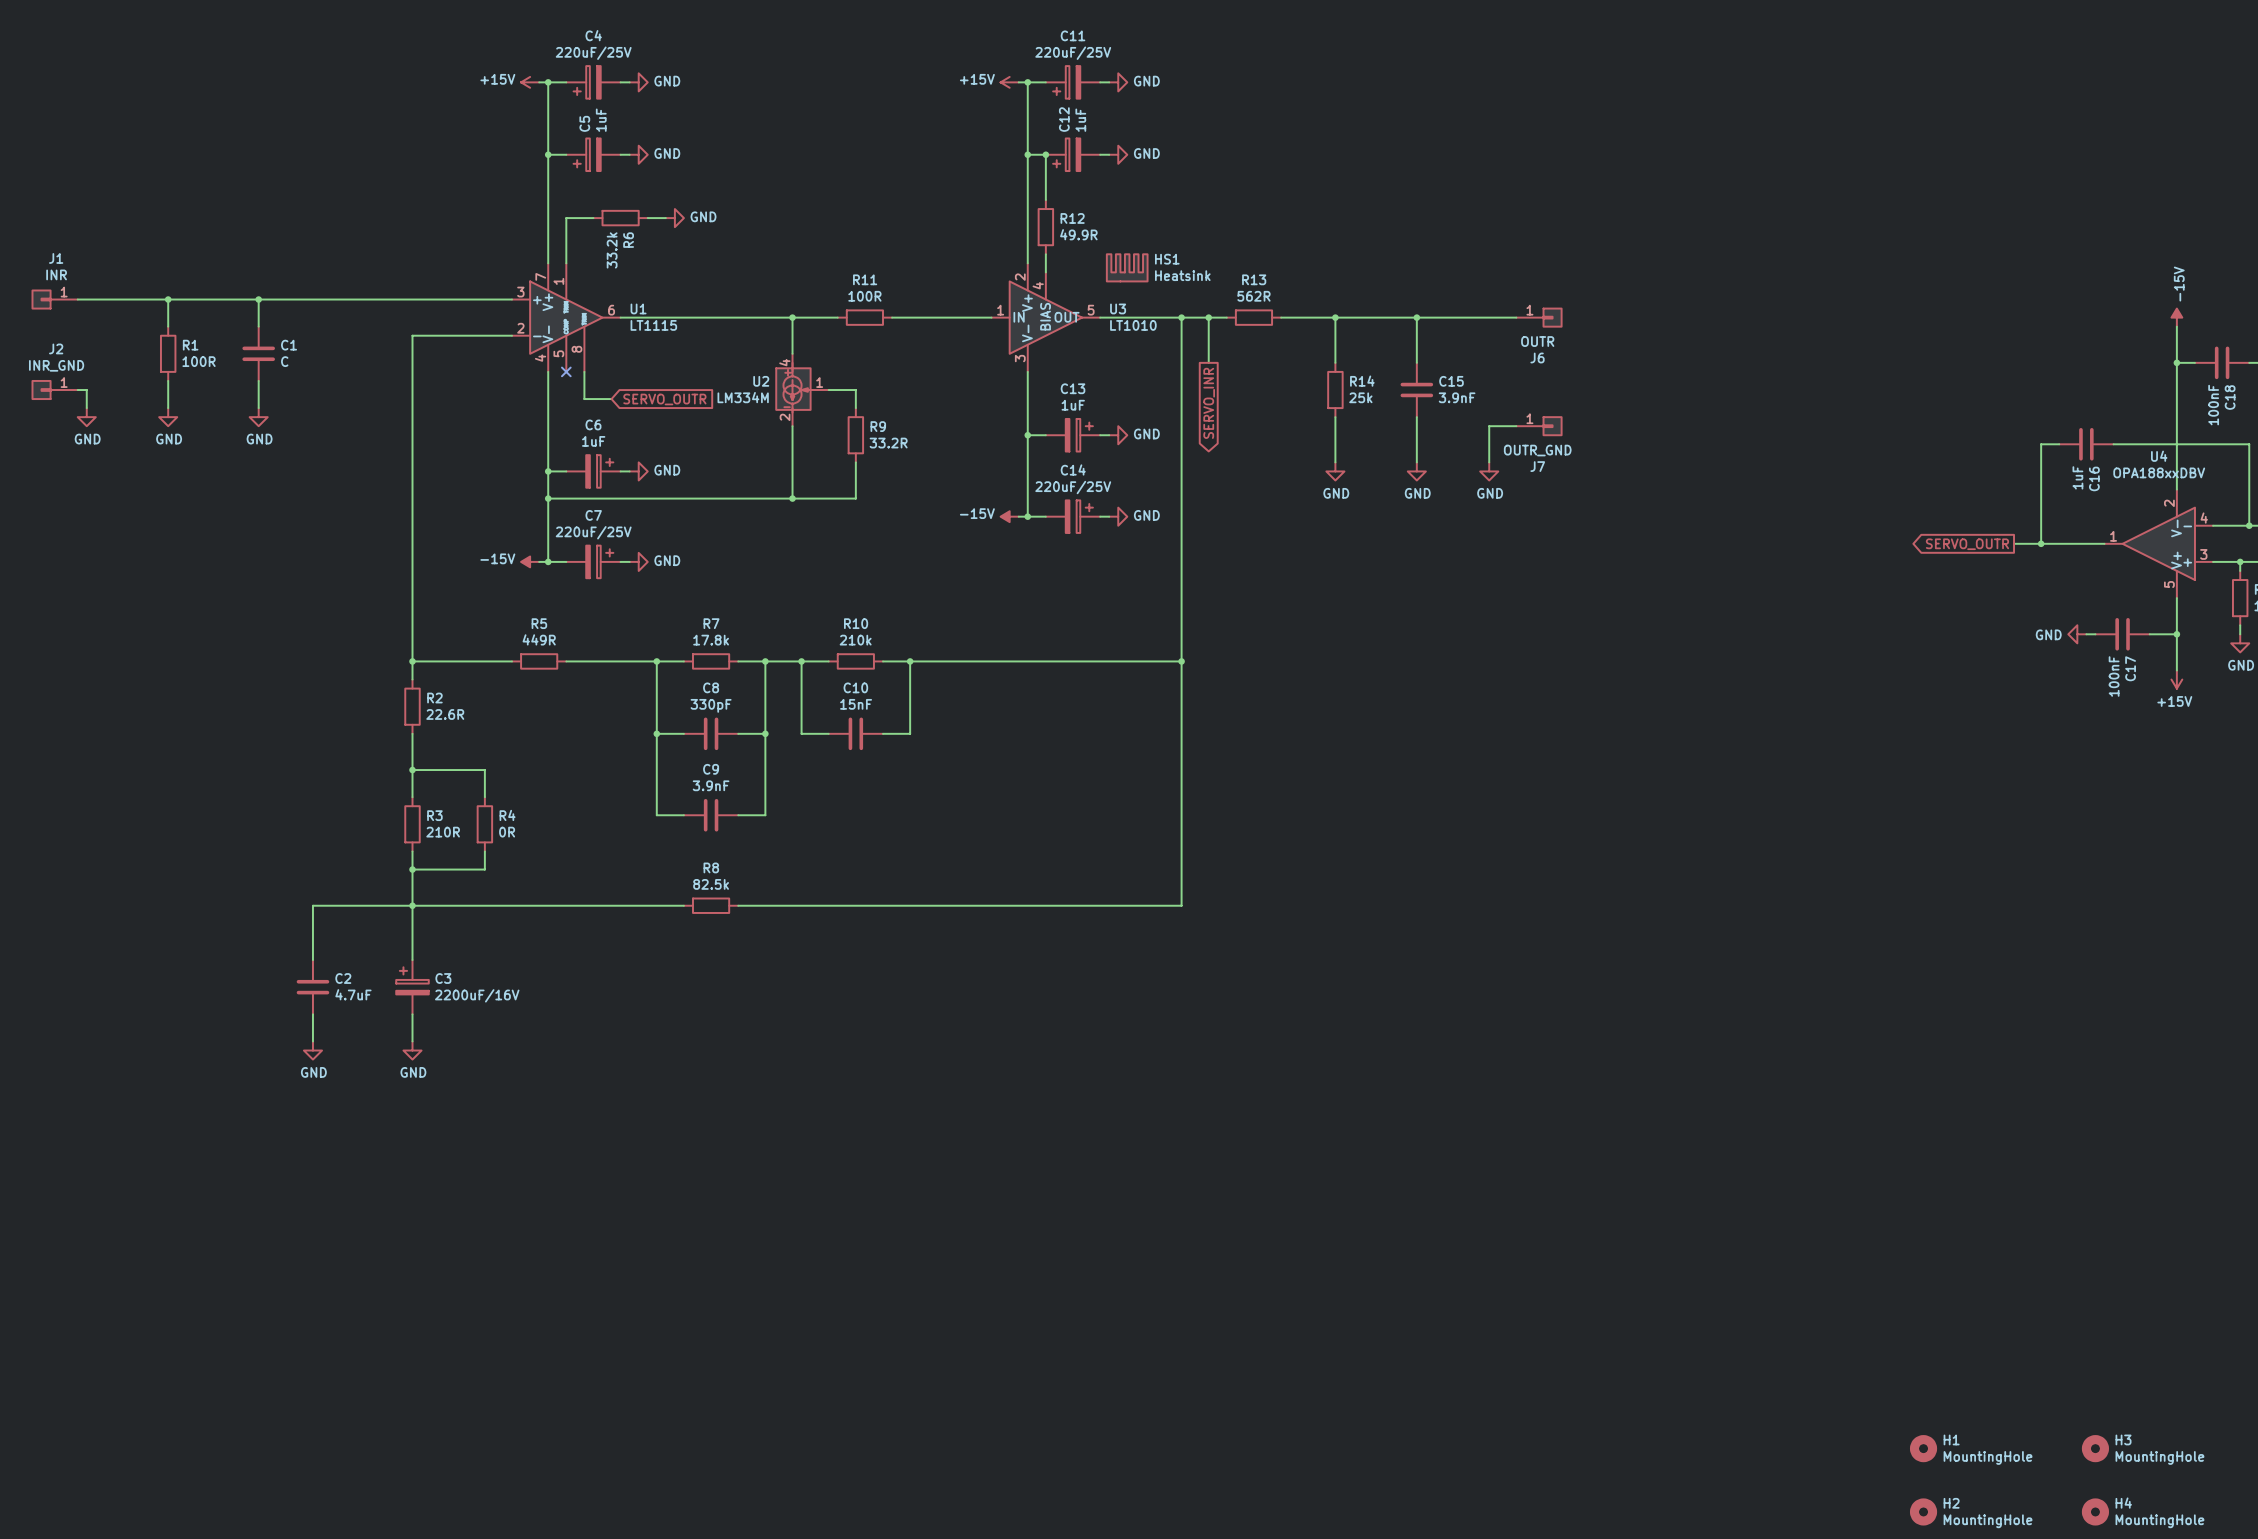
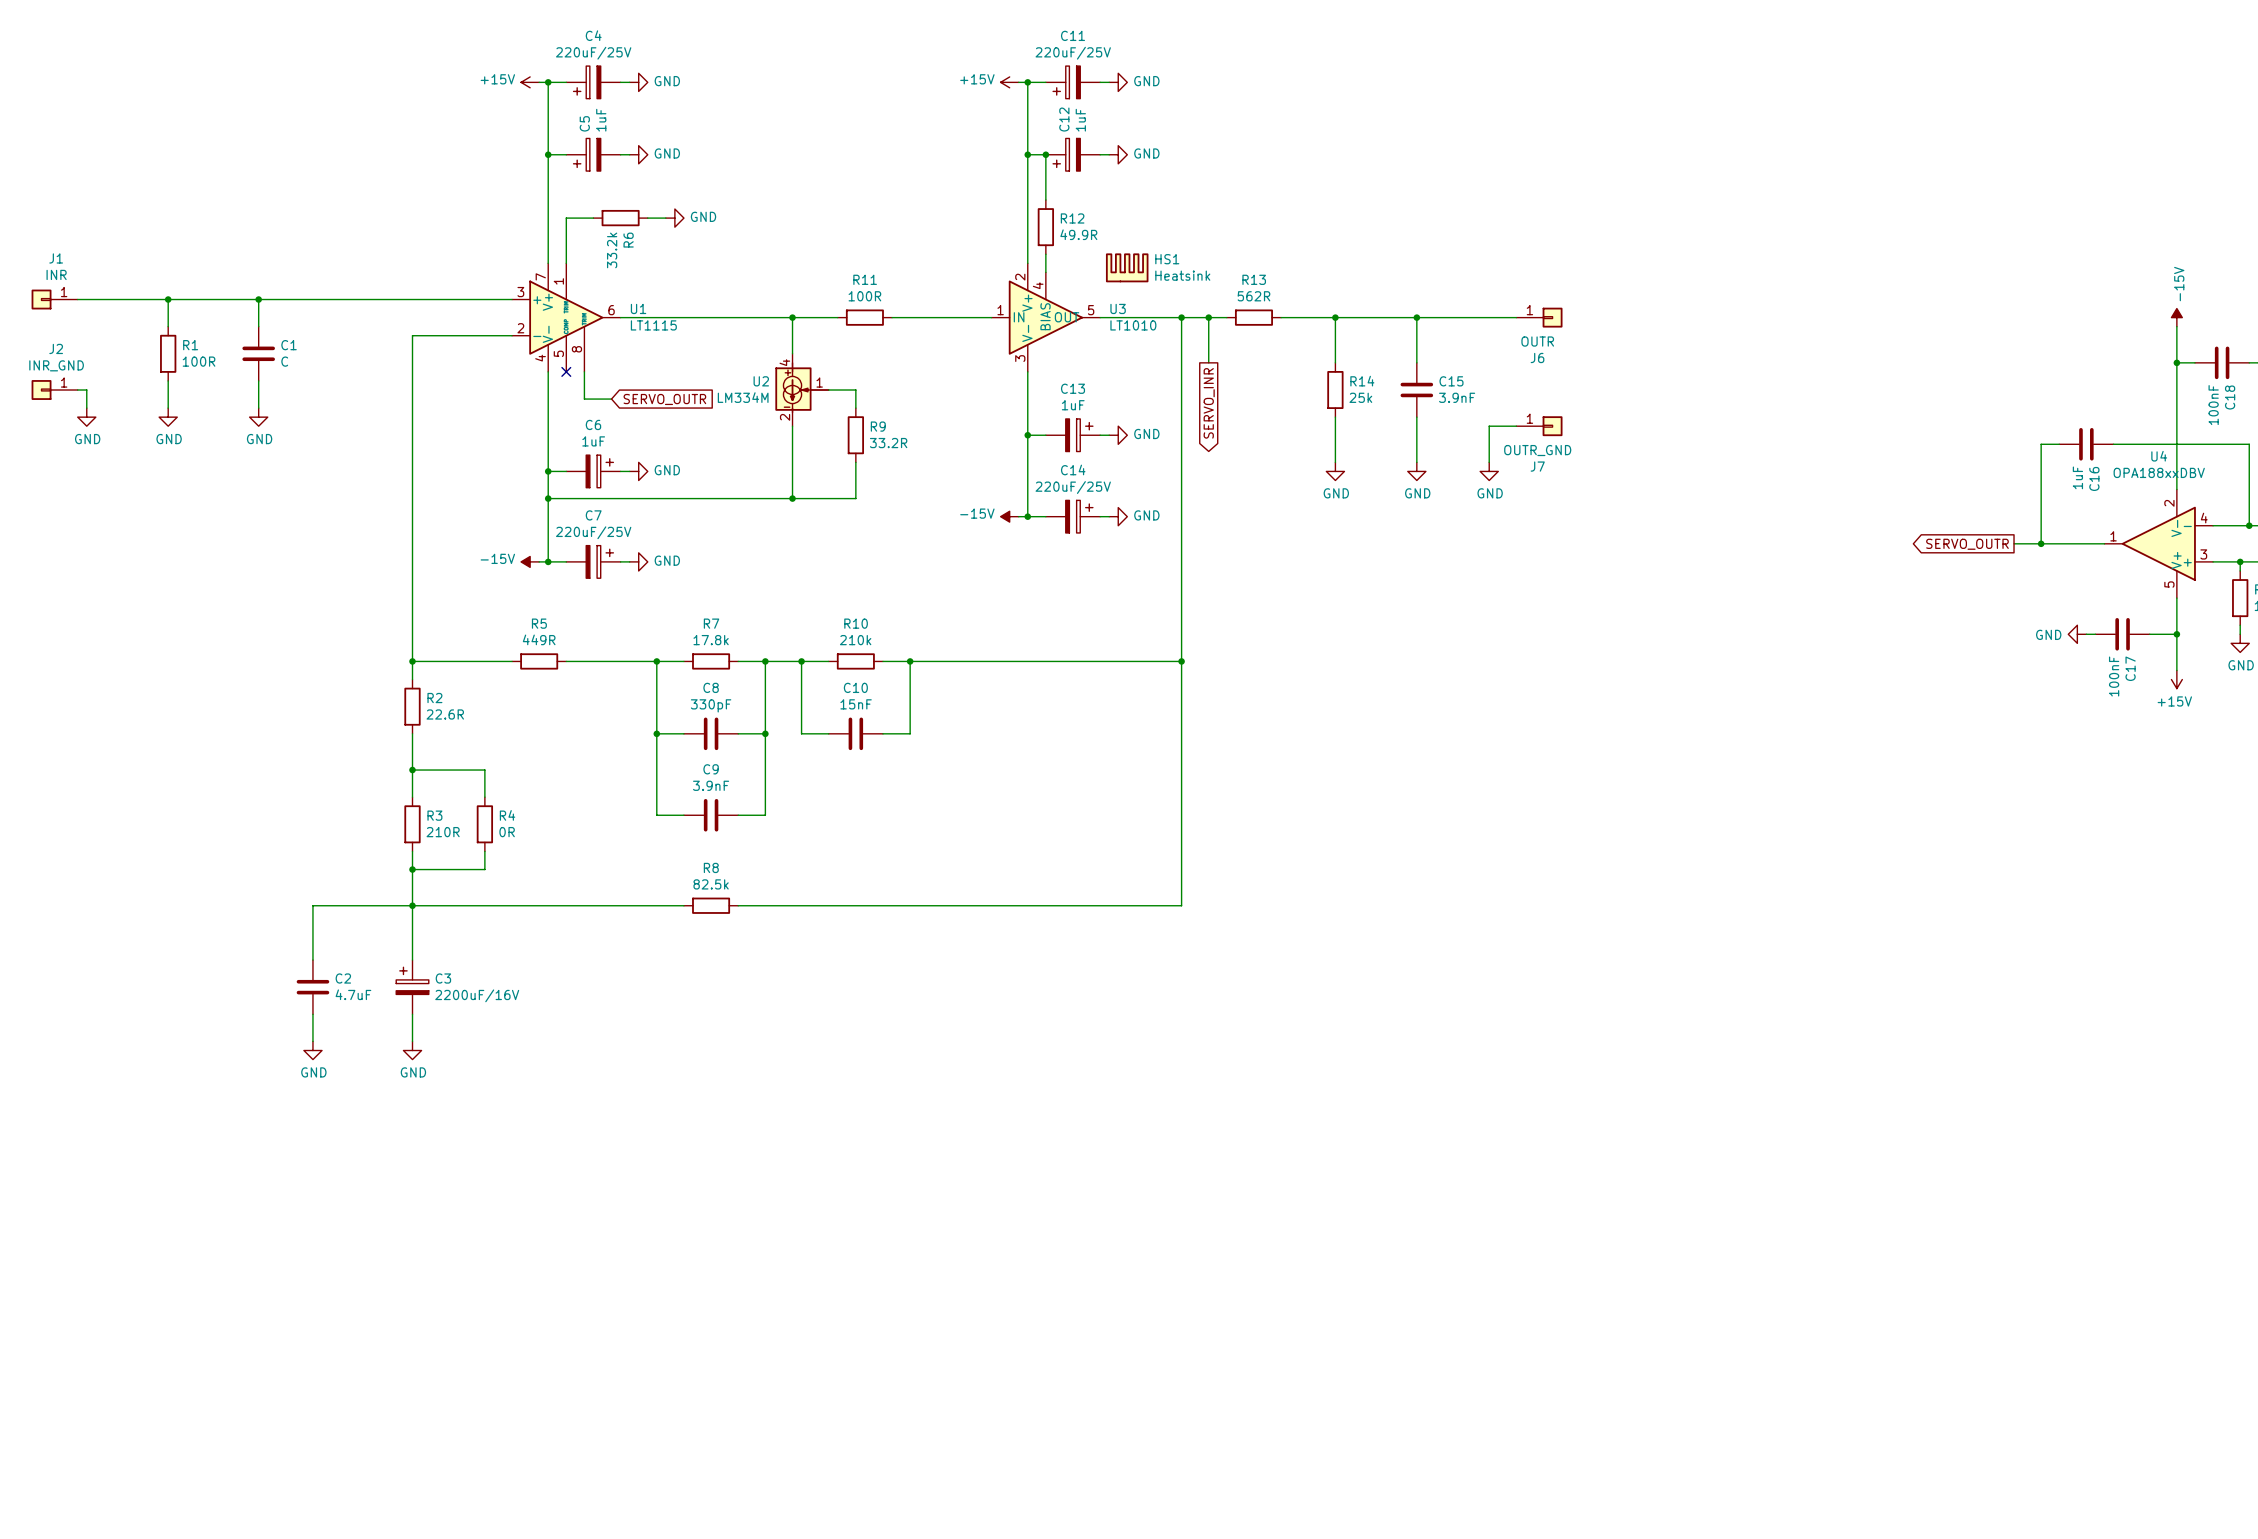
H1: MountingHole (1923, 1448) -> none
H3: MountingHole (2095, 1448) -> none
H2: MountingHole (1923, 1511) -> none
H4: MountingHole (2095, 1511) -> none

